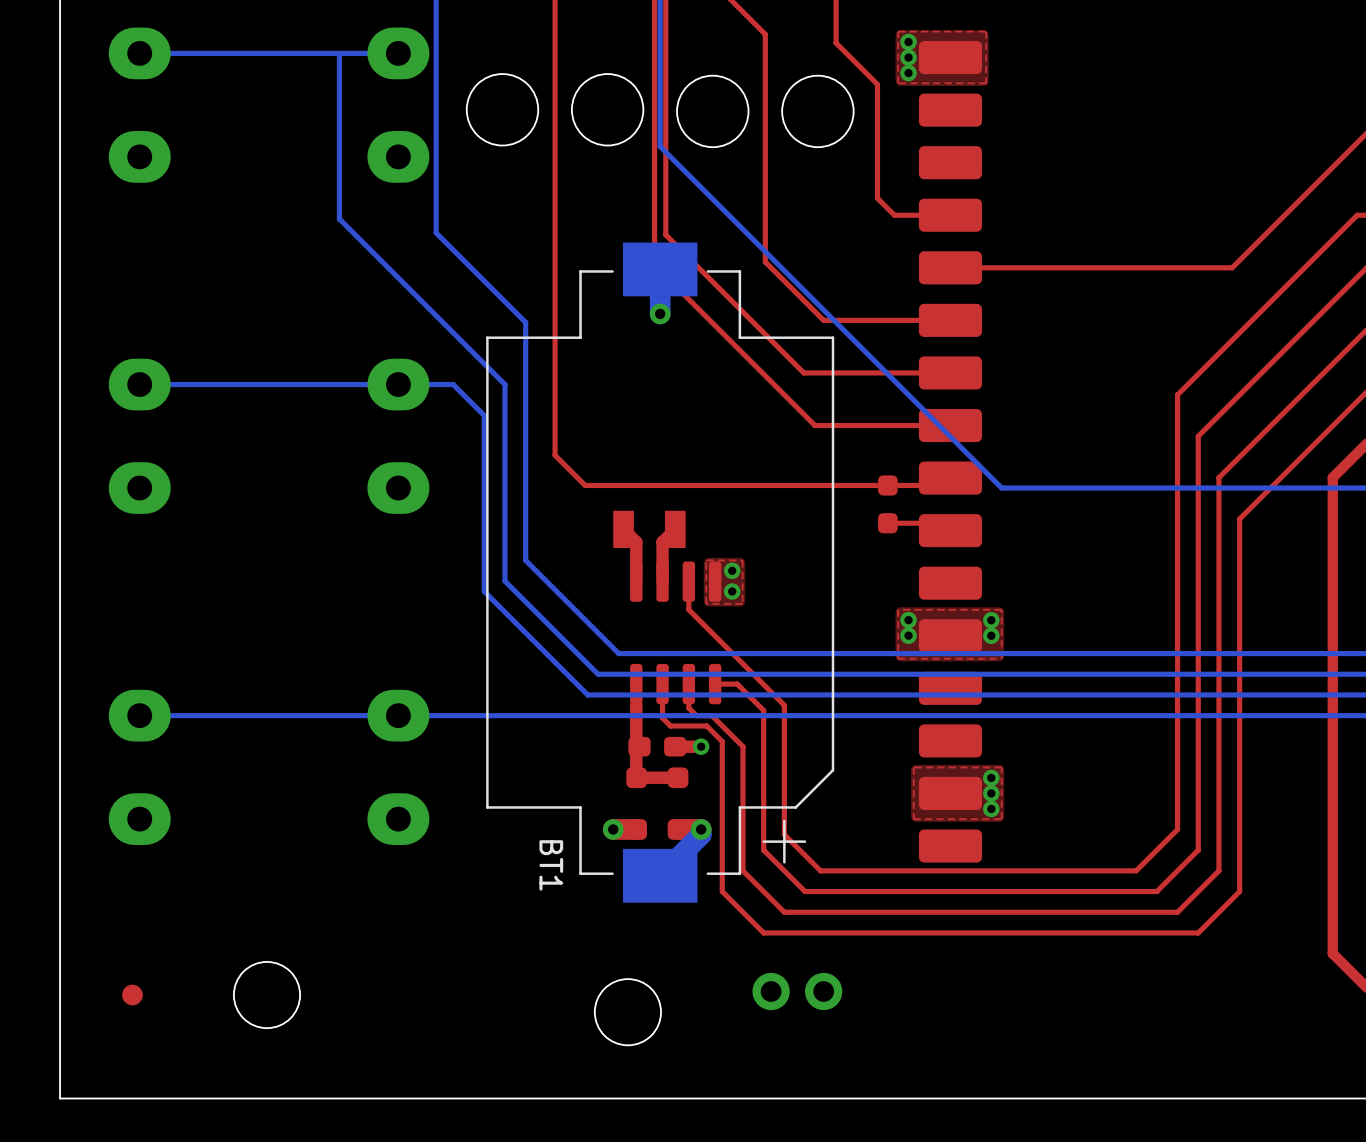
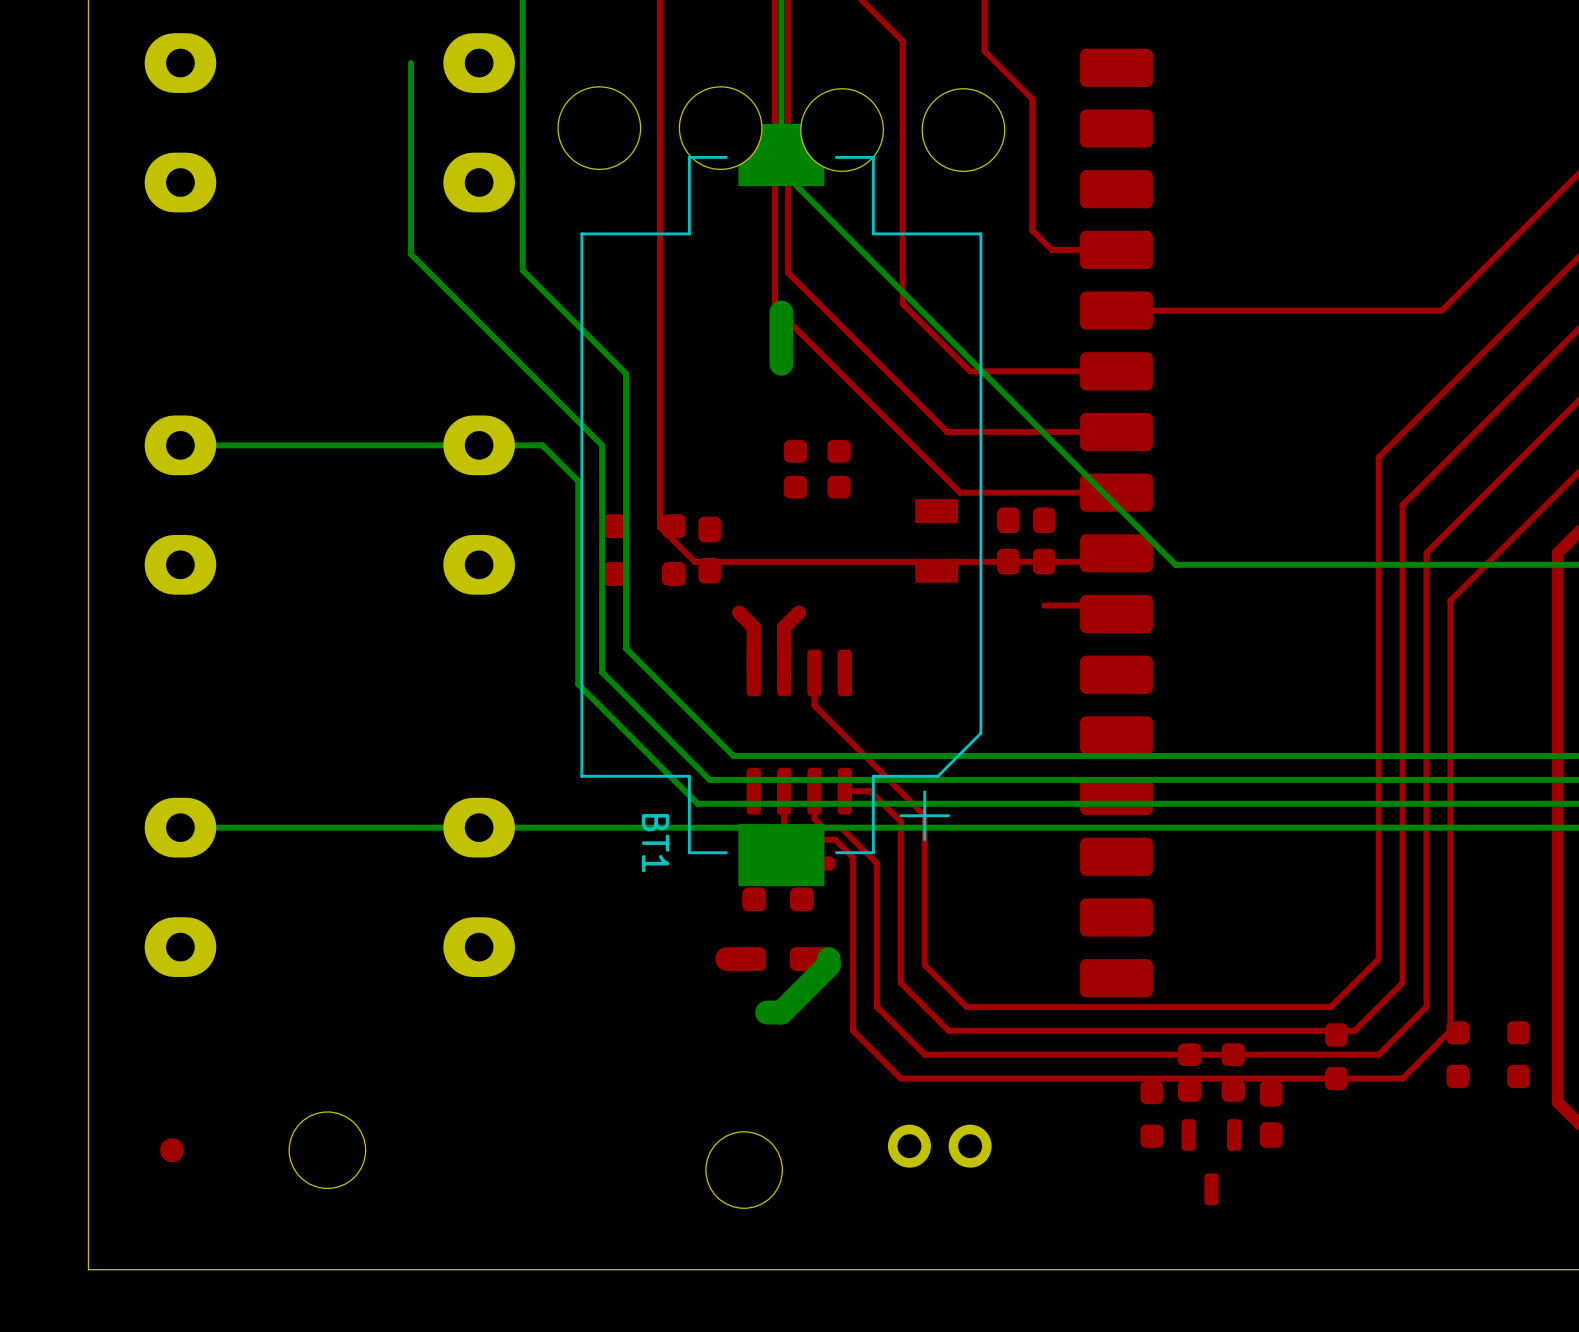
top zone outline: (986, 31) (986, 83) (898, 83) (898, 31) (986, 31) -> none
via: (908, 42) -> none
bottom track: (398, 53) (139, 53) -> none
via: (908, 57) -> none
via: (908, 73) -> none
via: (660, 313) -> none
part: none -> (817, 451)
part: none -> (817, 487)
part: none -> (643, 526)
part: none -> (1008, 540)
part: none -> (1044, 540)
part: none -> (709, 550)
part: none -> (643, 573)
part: (887, 504) -> none
part rotation: 0° (649, 529) -> 90° clockwise (936, 540)
part position: (649, 529) -> (936, 540)
top zone outline: (742, 560) (706, 560) (706, 603) (742, 603) (742, 560) -> none
via: (732, 570) -> none
BT1 position: (660, 572) -> (781, 505)
via: (732, 591) -> none
top zone outline: (1001, 609) (1001, 658) (898, 658) (898, 609) (1001, 609) -> none
via: (908, 620) -> none
via: (991, 620) -> none
via: (908, 635) -> none
via: (991, 635) -> none
top track: (636, 704) (636, 777) (678, 777) -> none
via: (701, 746) -> none
top zone outline: (1001, 767) (913, 767) (913, 819) (1001, 819) (1001, 767) -> none
via: (991, 777) -> none
via: (991, 793) -> none
via: (991, 808) -> none
via: (613, 829) -> none
via: (701, 829) -> none
part: none -> (1211, 1054)
part: none -> (1457, 1054)
part: none -> (1518, 1054)
part: none -> (1336, 1056)
part: none -> (1211, 1090)
part: none -> (1151, 1114)
part: none -> (1271, 1114)
part: none -> (1211, 1162)

